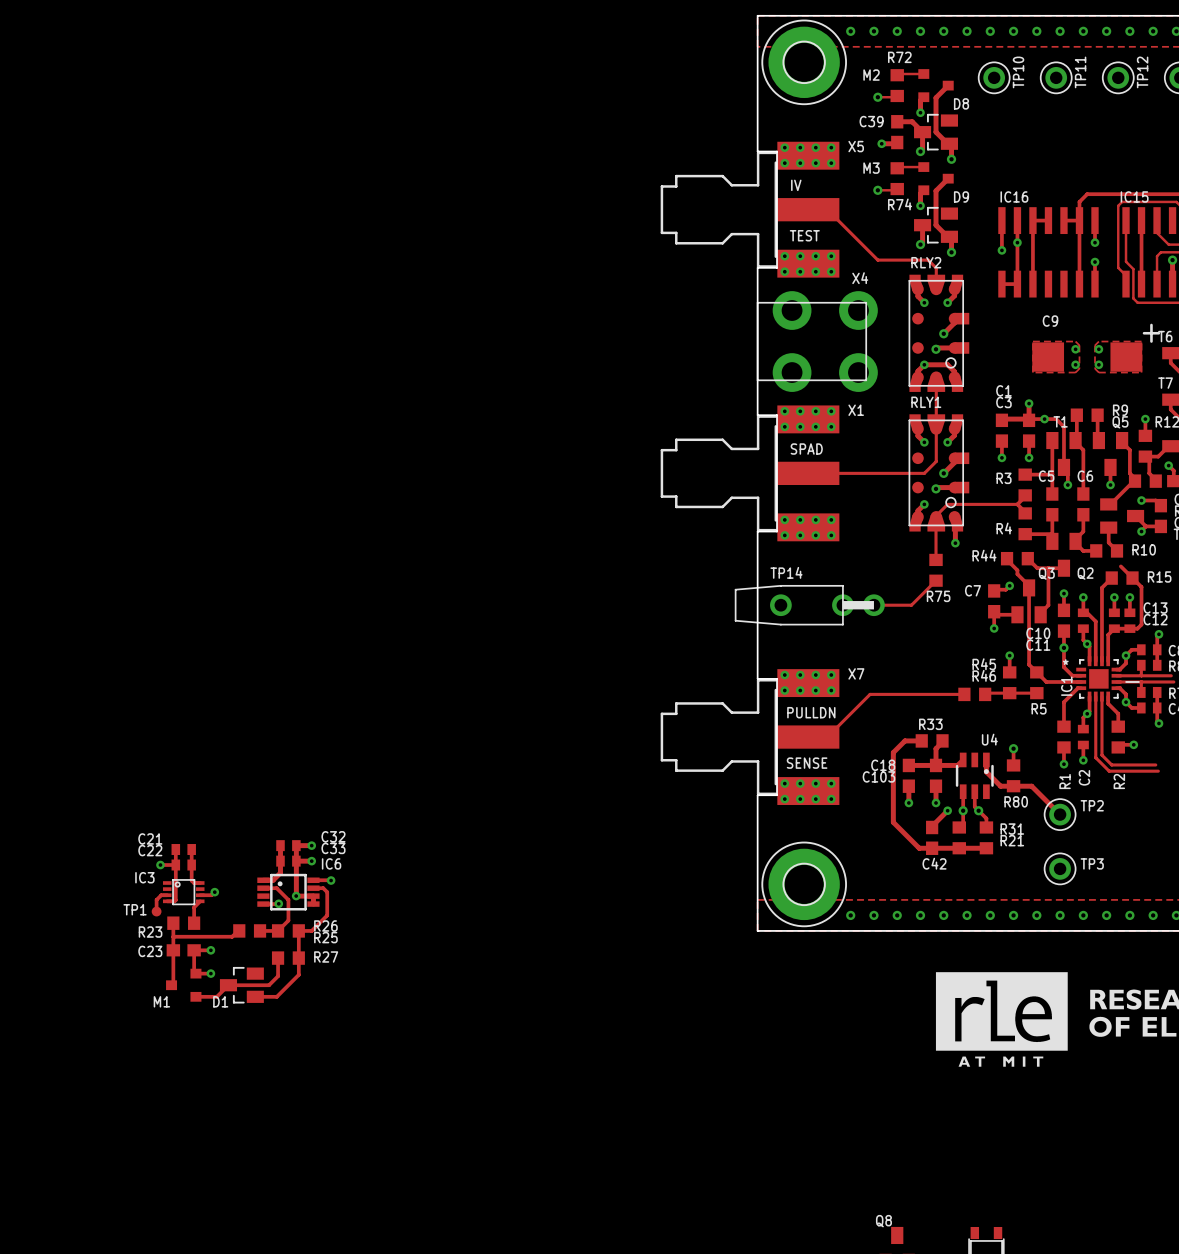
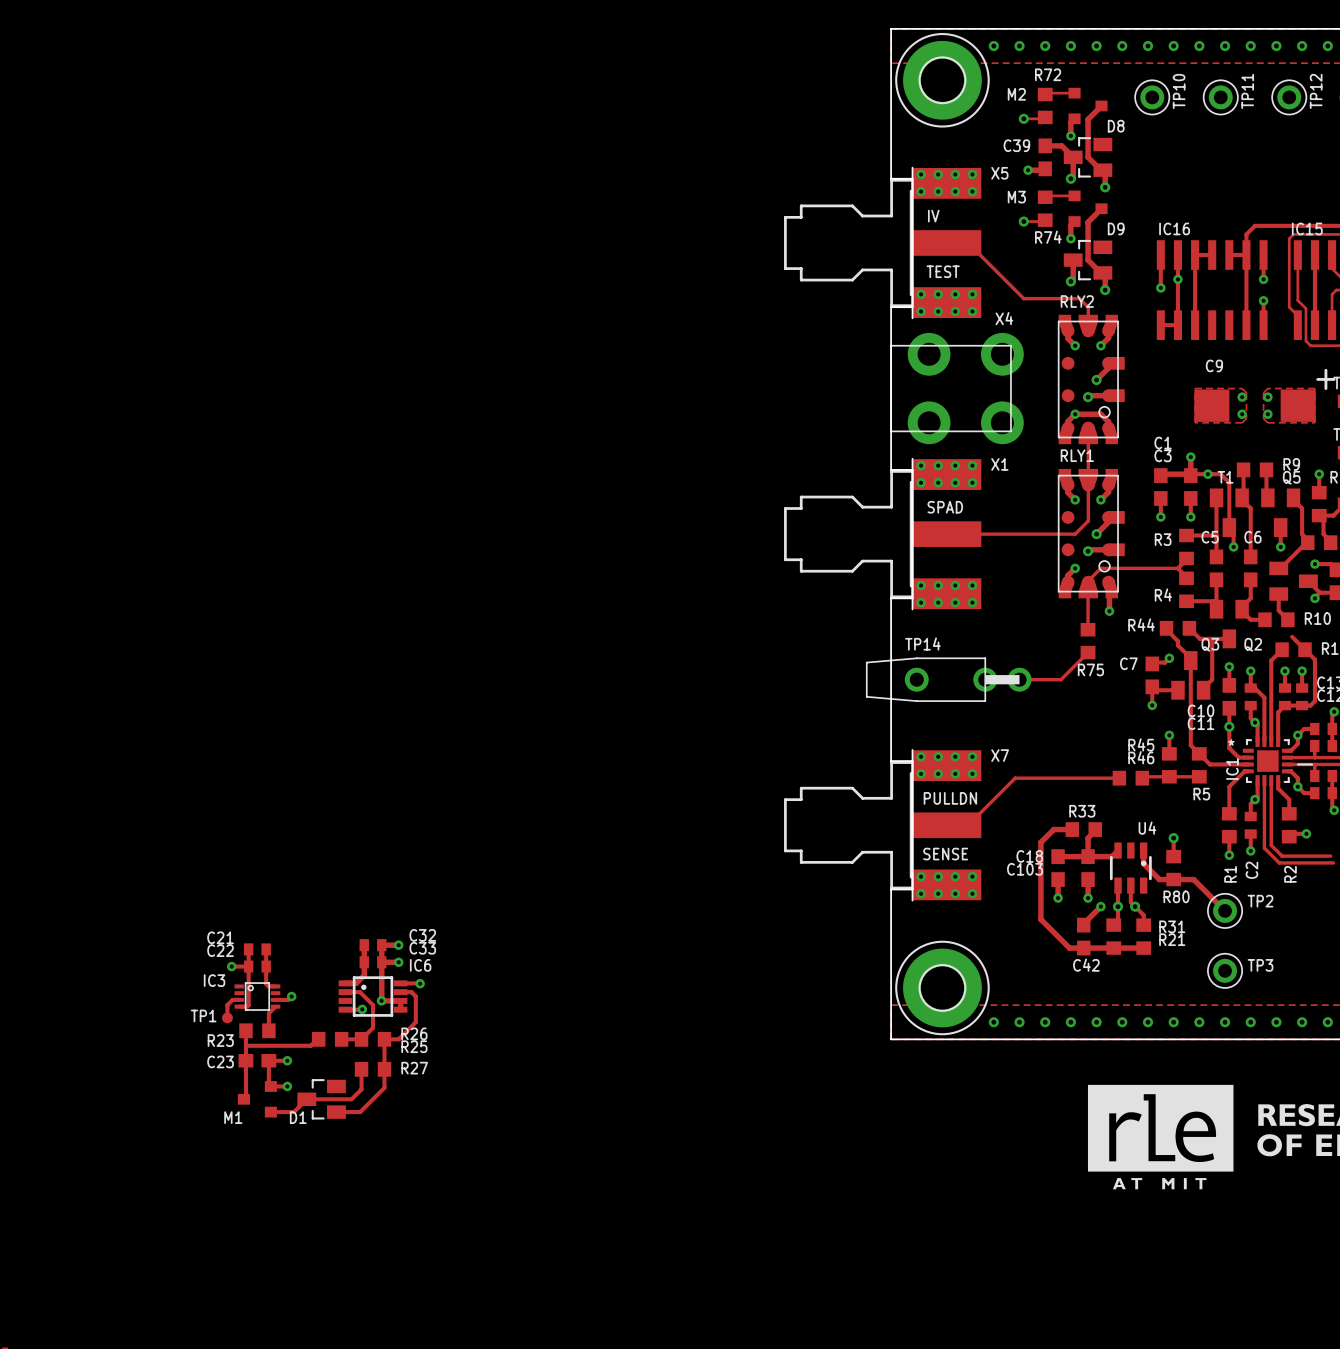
X5 footprint: [660, 141, 840, 278] -> [784, 167, 982, 319]
X1 footprint: [660, 405, 840, 542] -> [784, 458, 982, 610]
X7 footprint: [660, 669, 840, 805] -> [784, 749, 982, 901]

